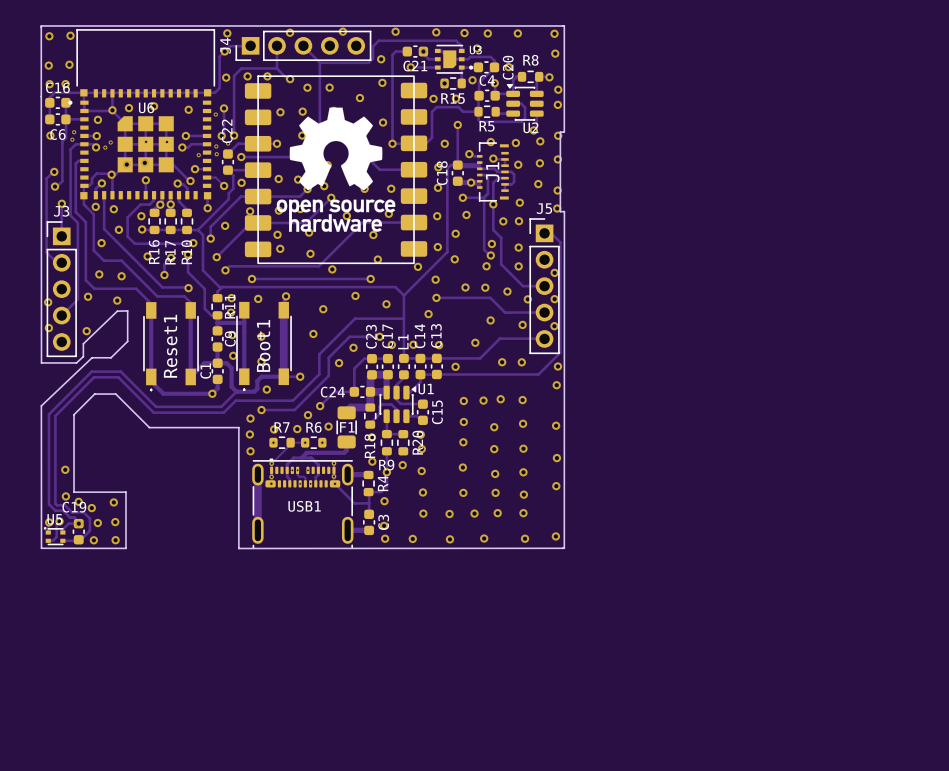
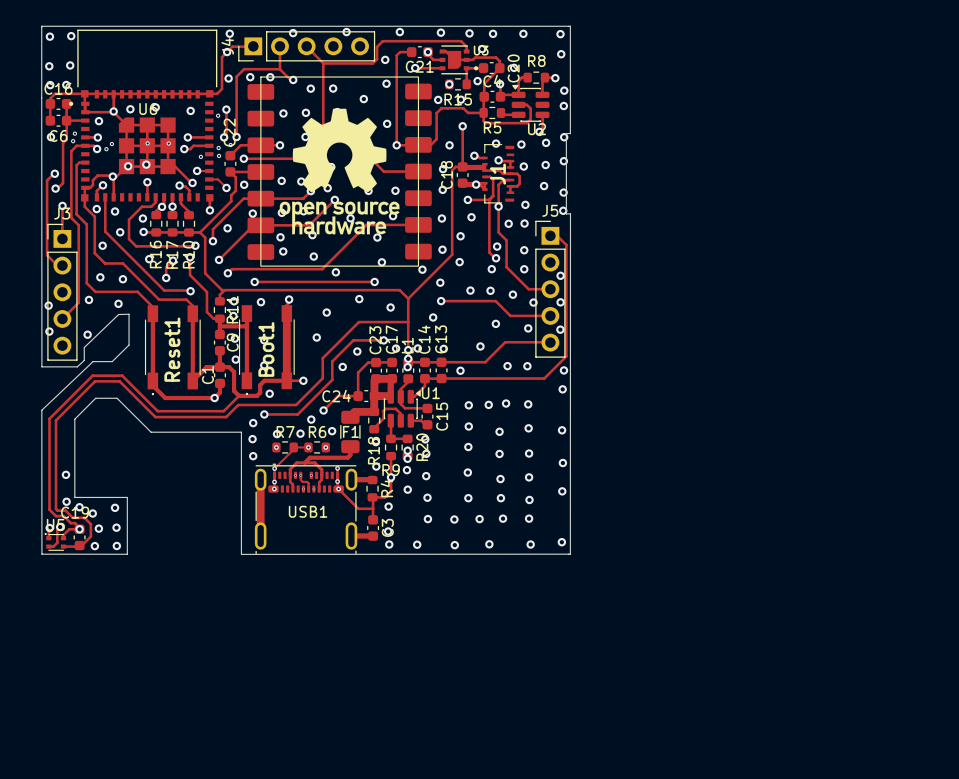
via: none -> (408, 350)
via: none -> (408, 358)
via: none -> (407, 367)
via: none -> (407, 450)
via: none -> (407, 458)
via: none -> (407, 489)

